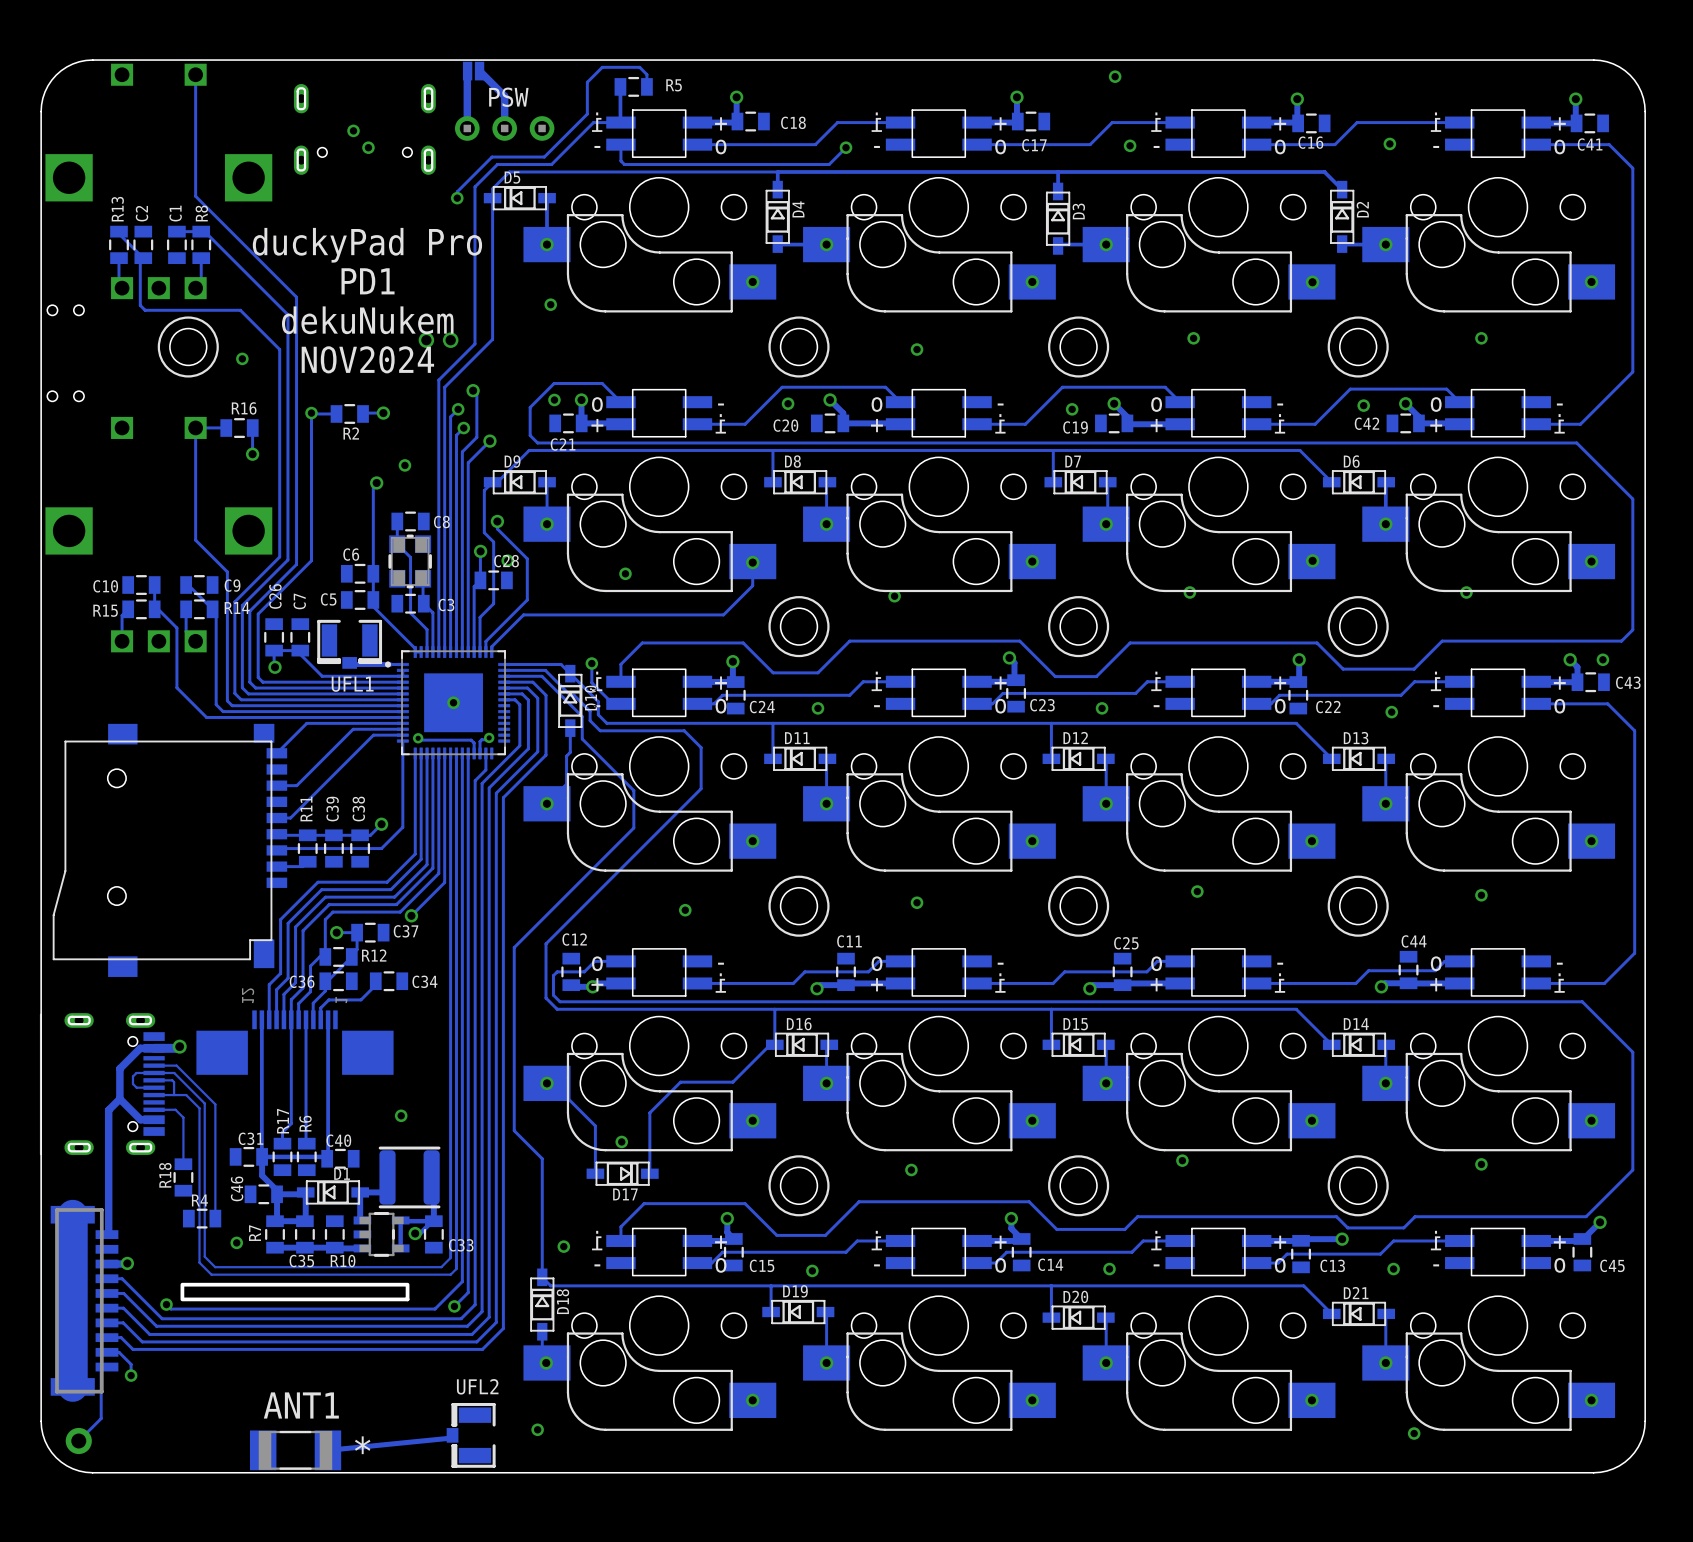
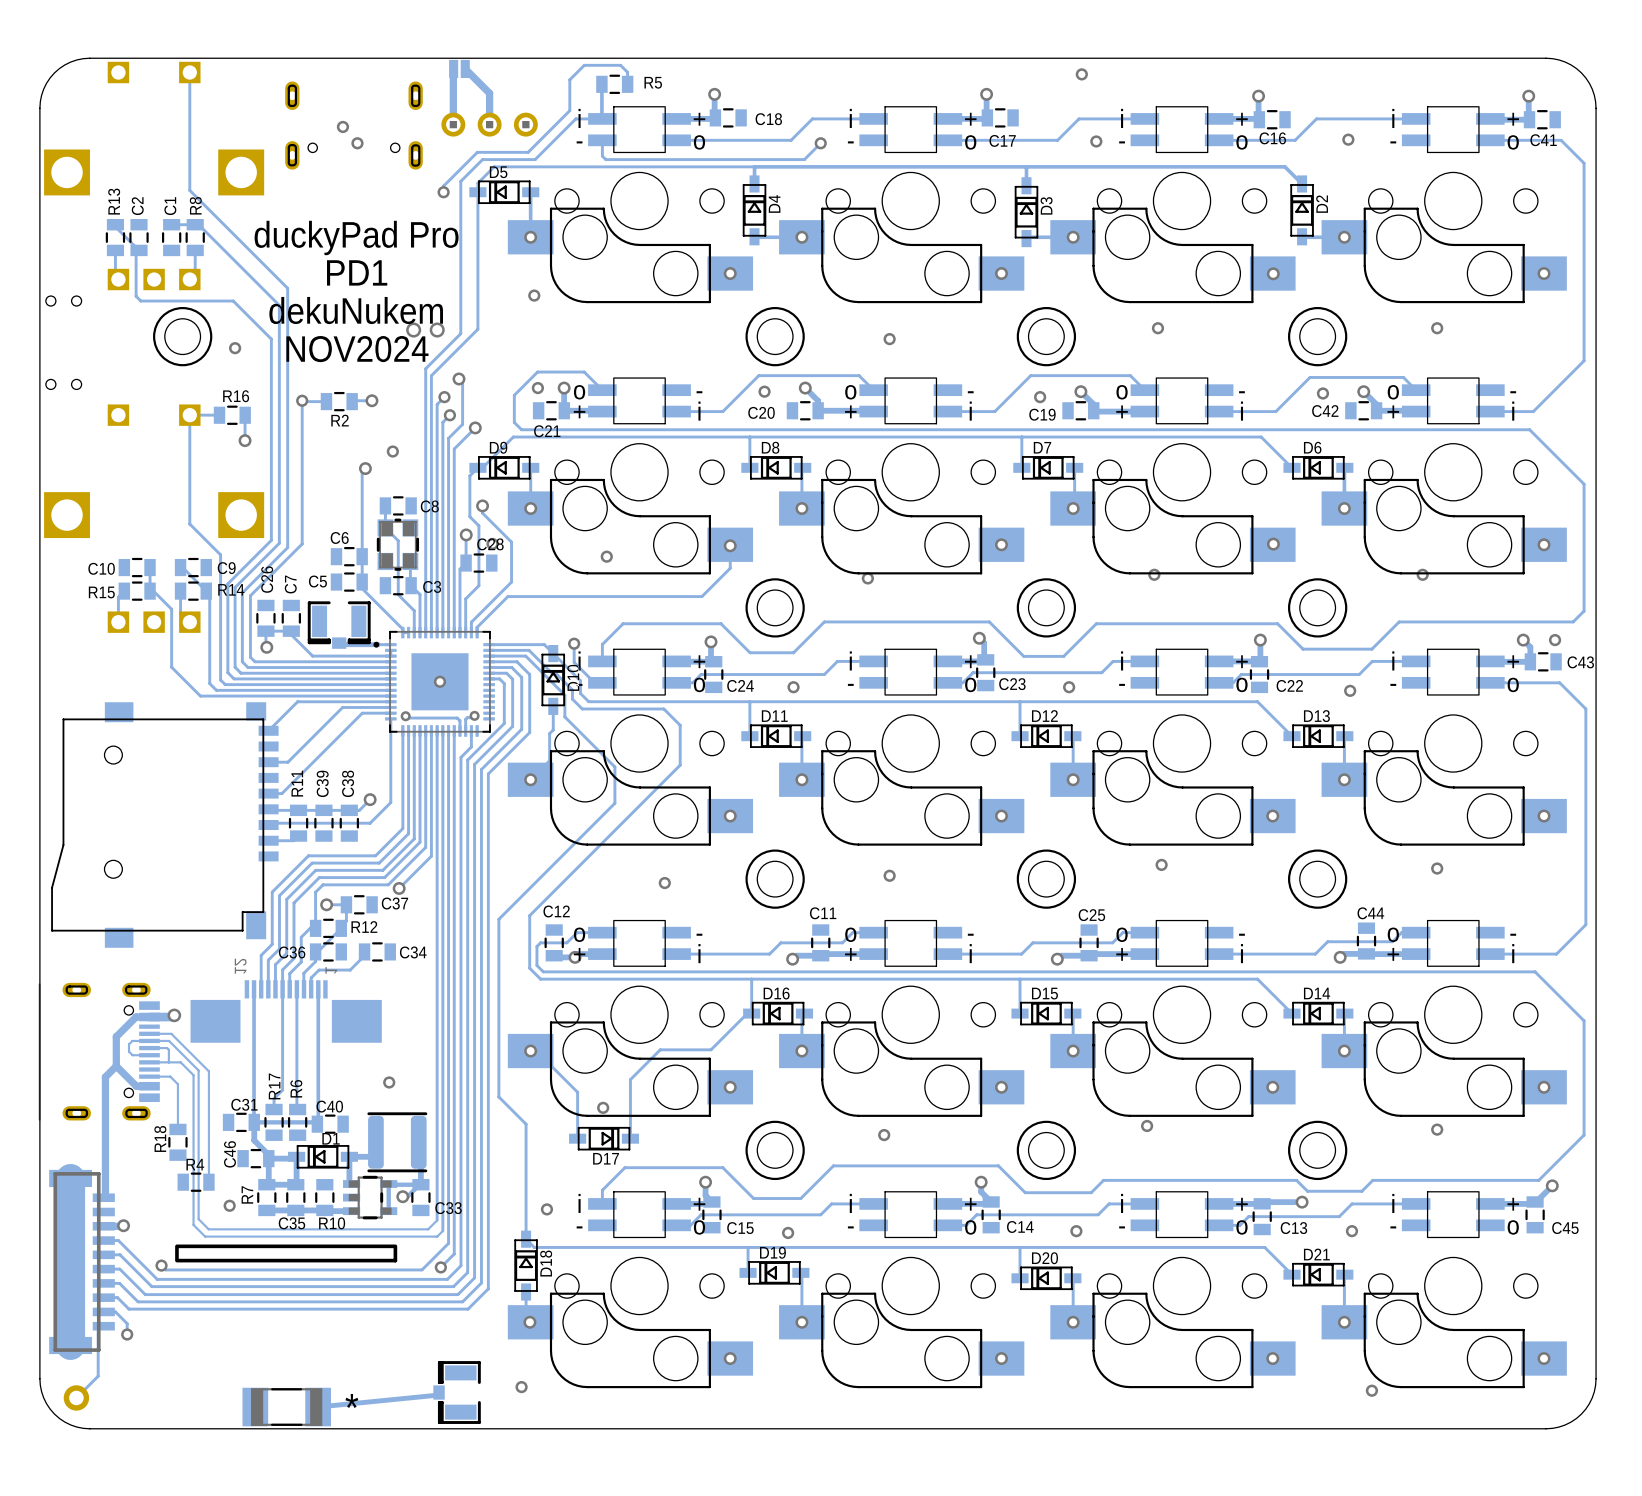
text: PSW (508, 97) -> none
text: UFL1 (352, 684) -> none
text: UFL2 (477, 1386) -> none
text: ANT1 (301, 1405) -> none

